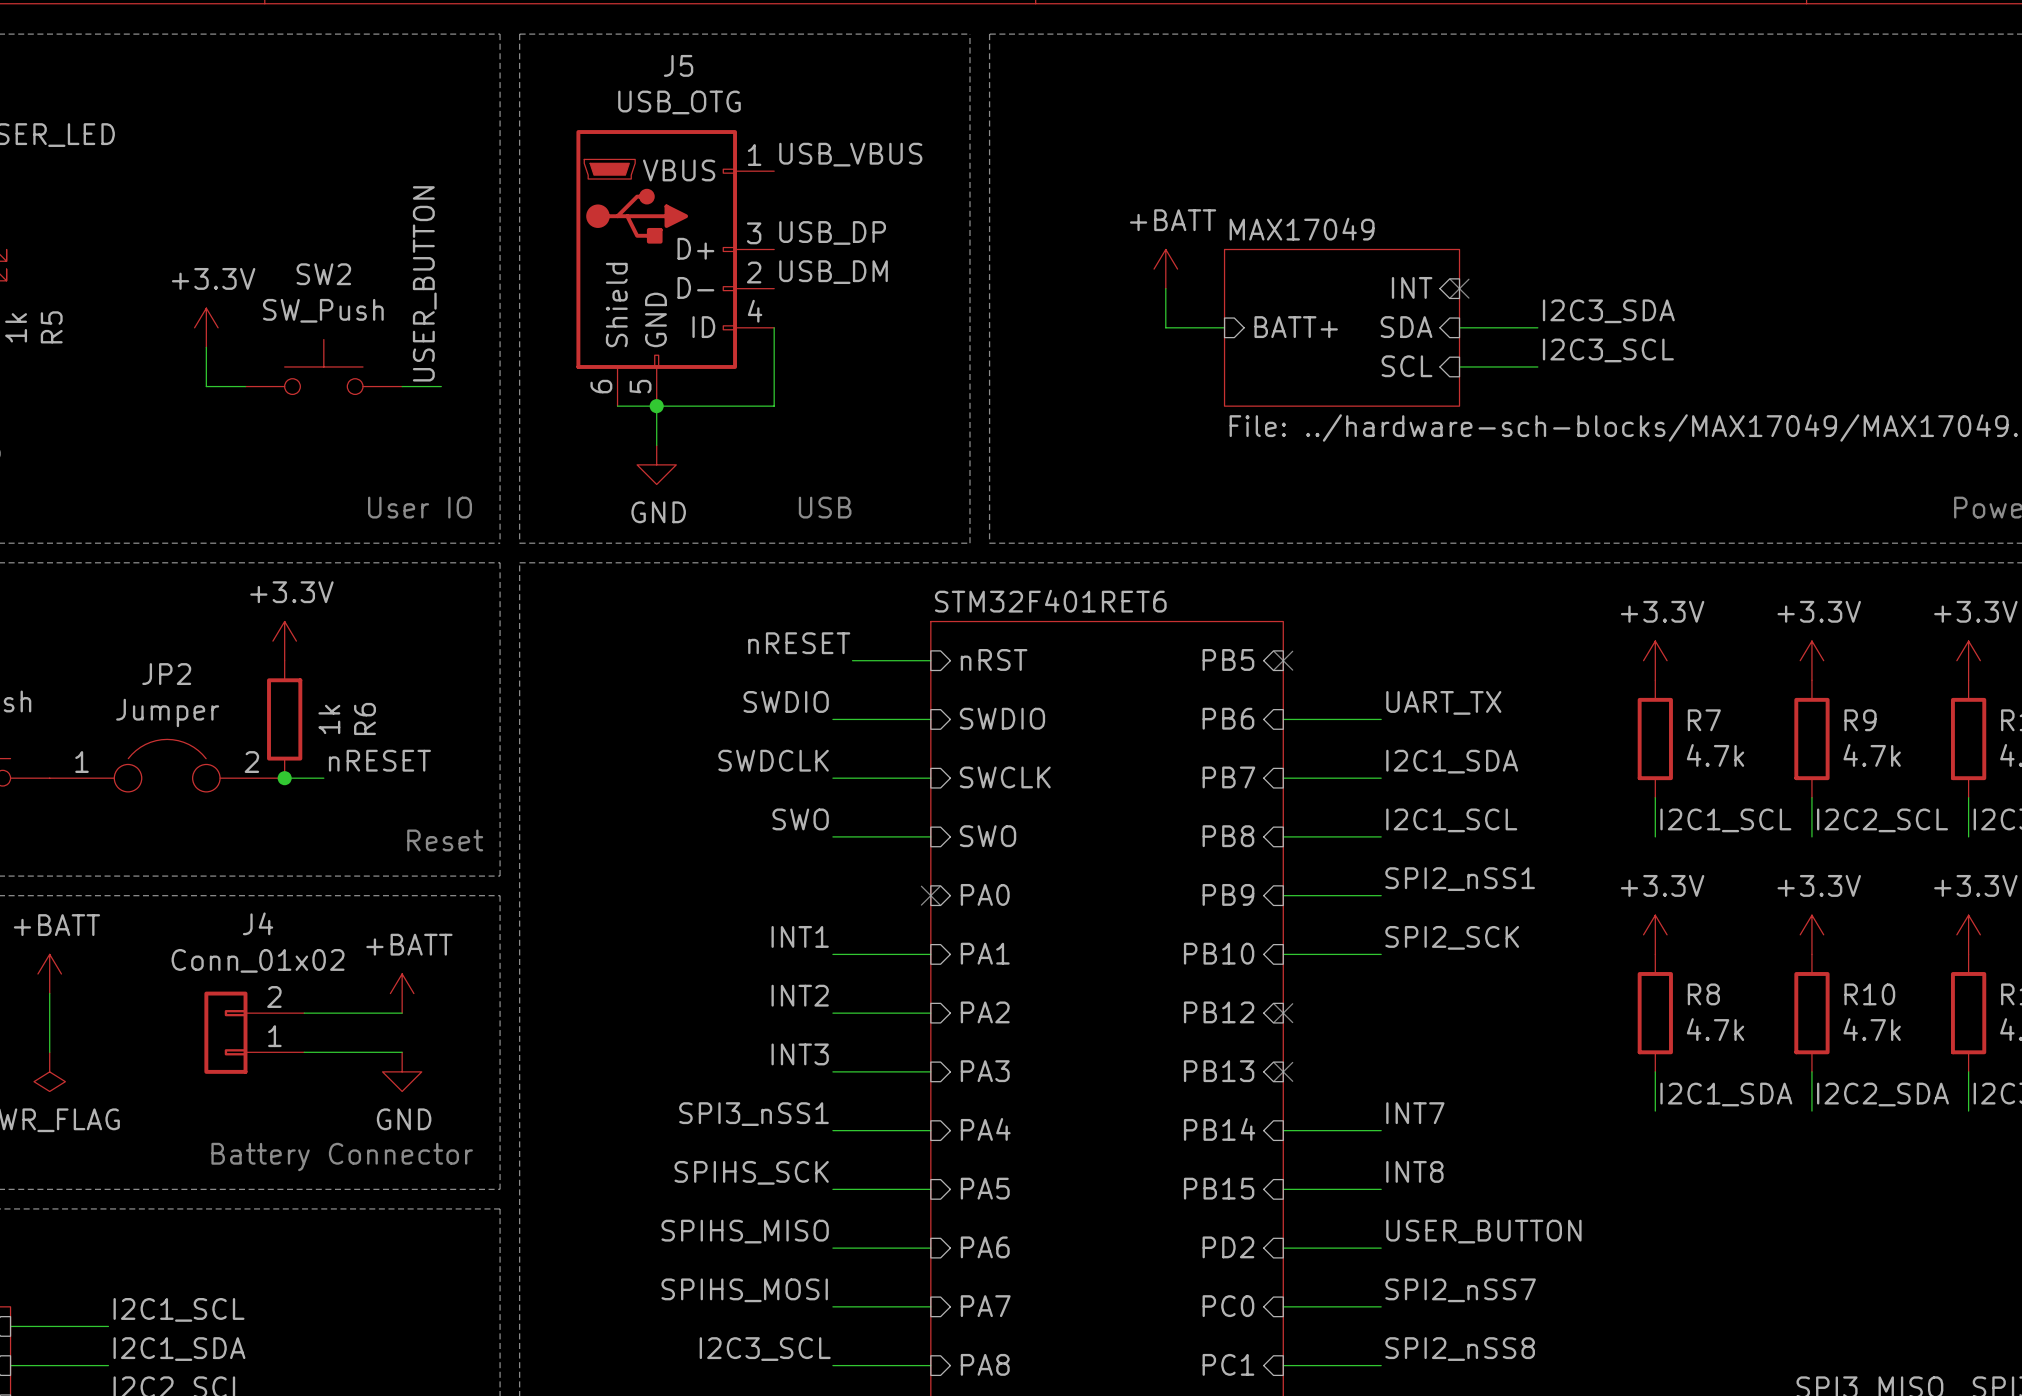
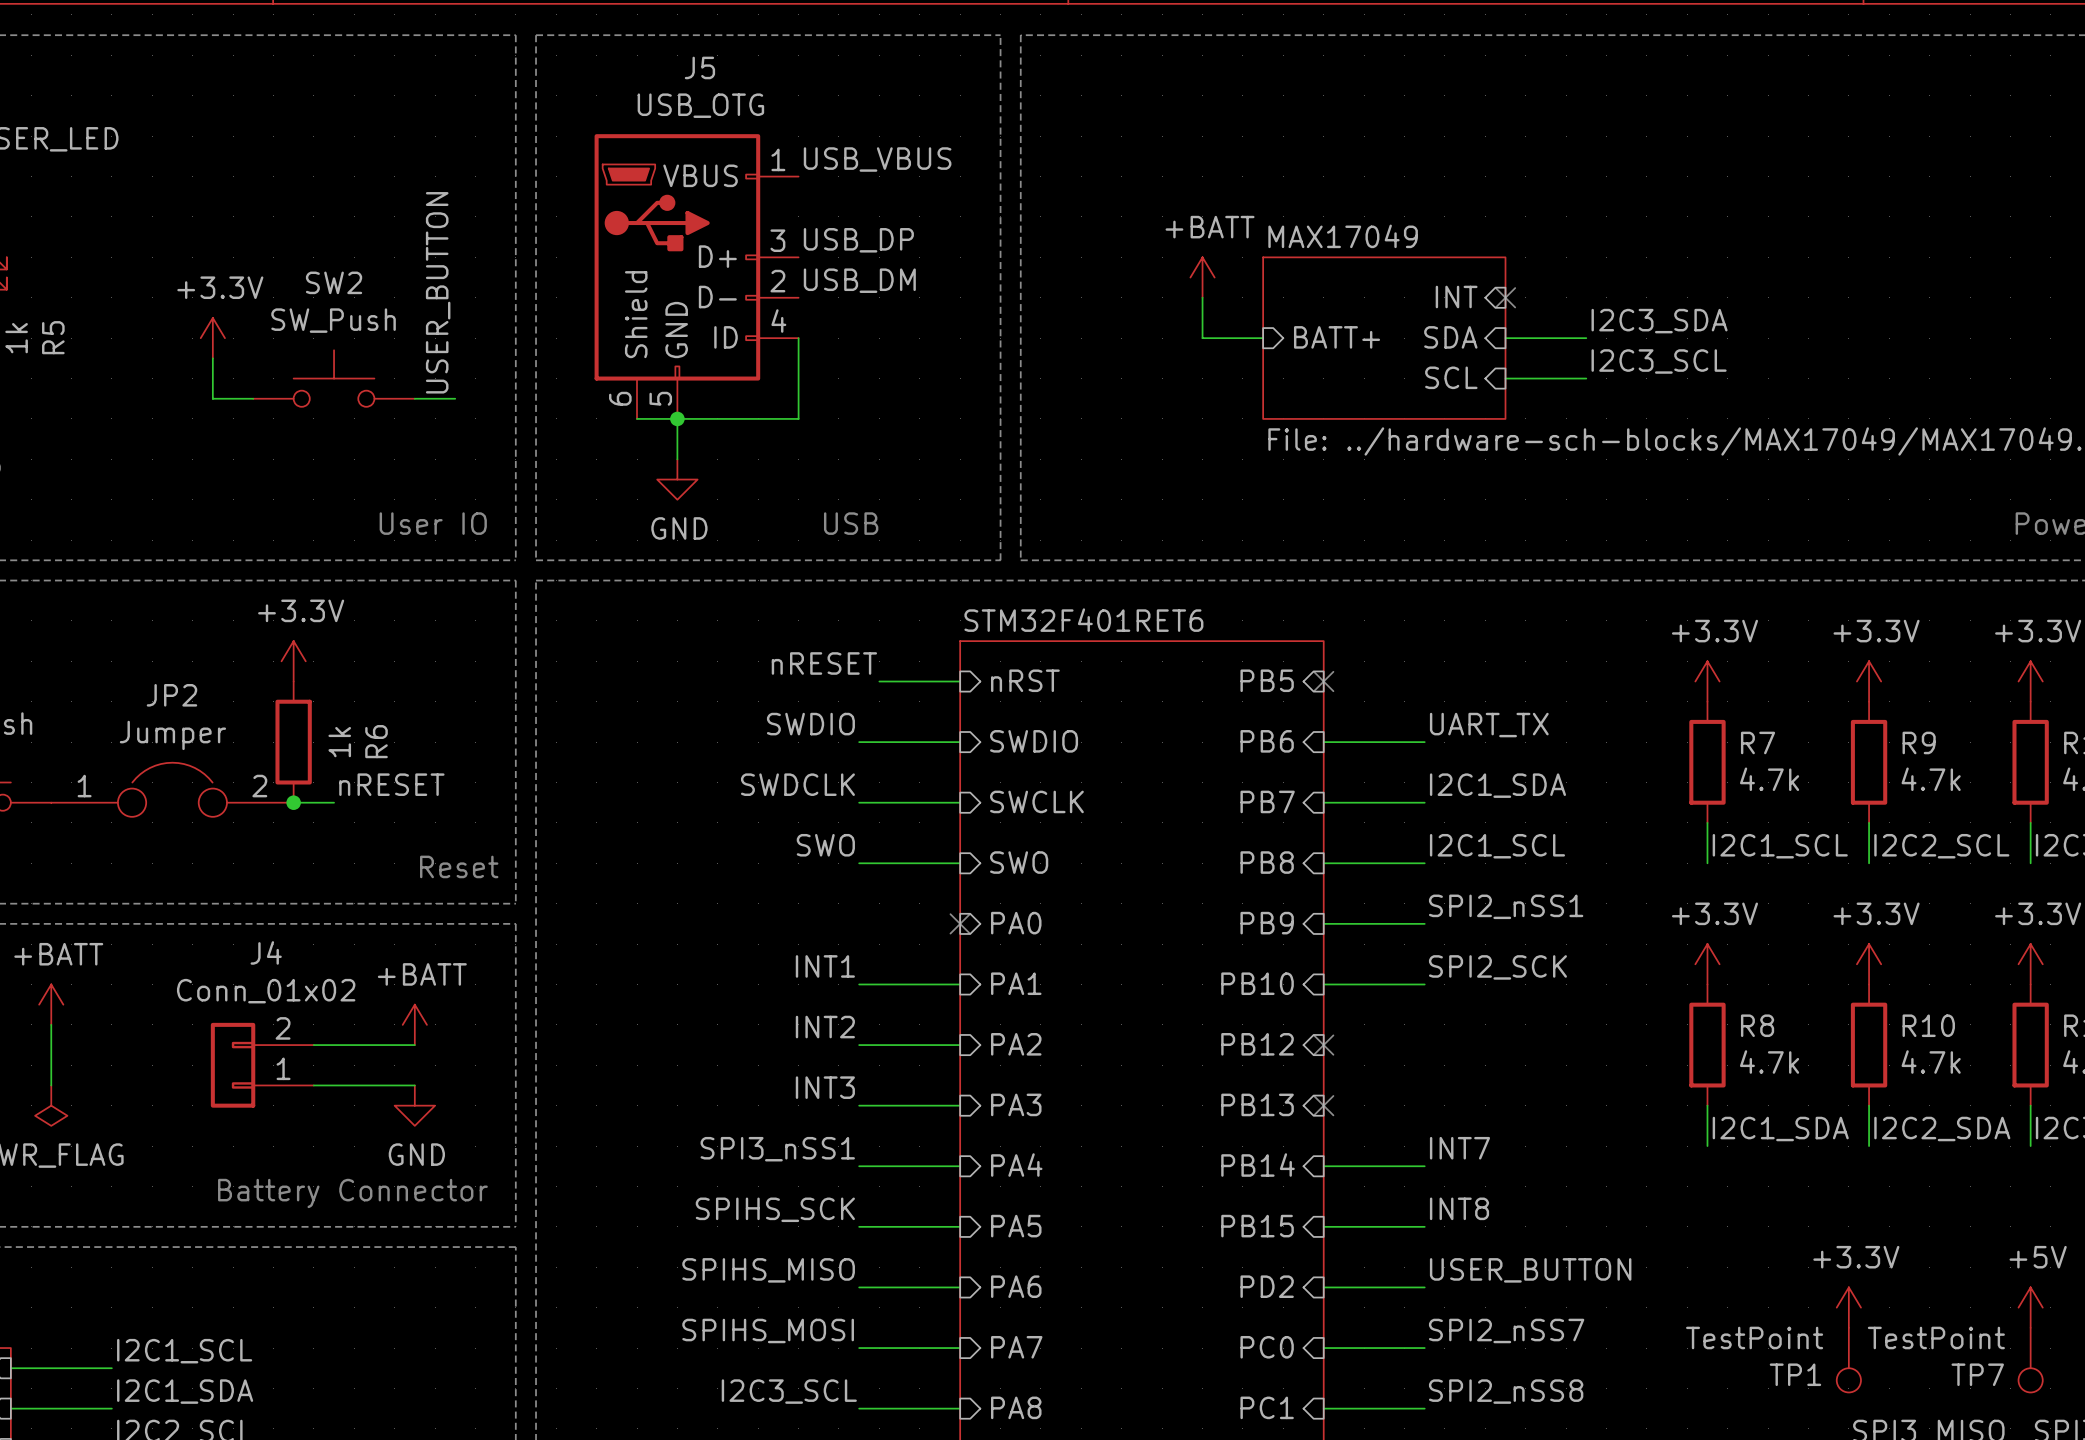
power symbol: none -> +3.3V (1848, 1307)
power symbol: none -> +5V (2030, 1307)
TP1: none -> TestPoint (1848, 1360)
TP7: none -> TestPoint (2030, 1360)

